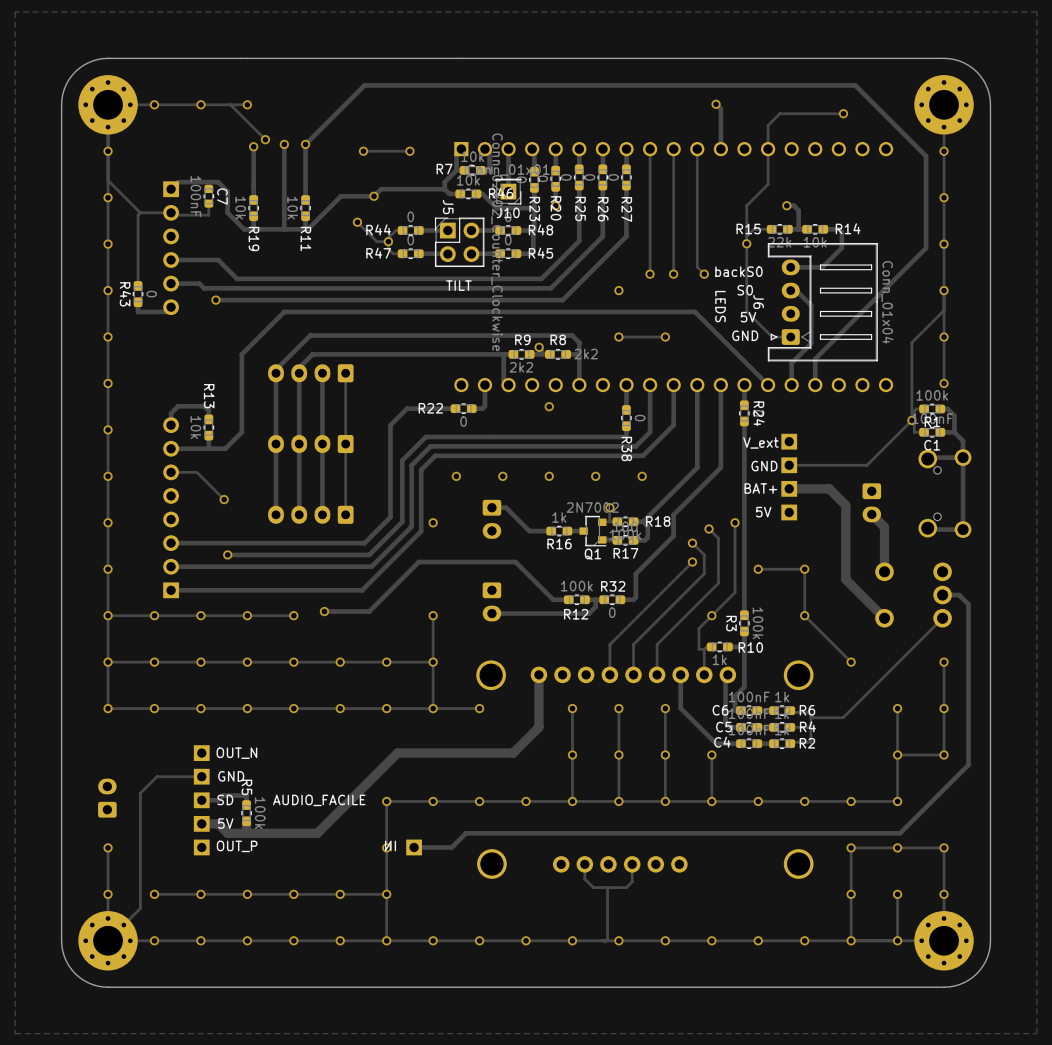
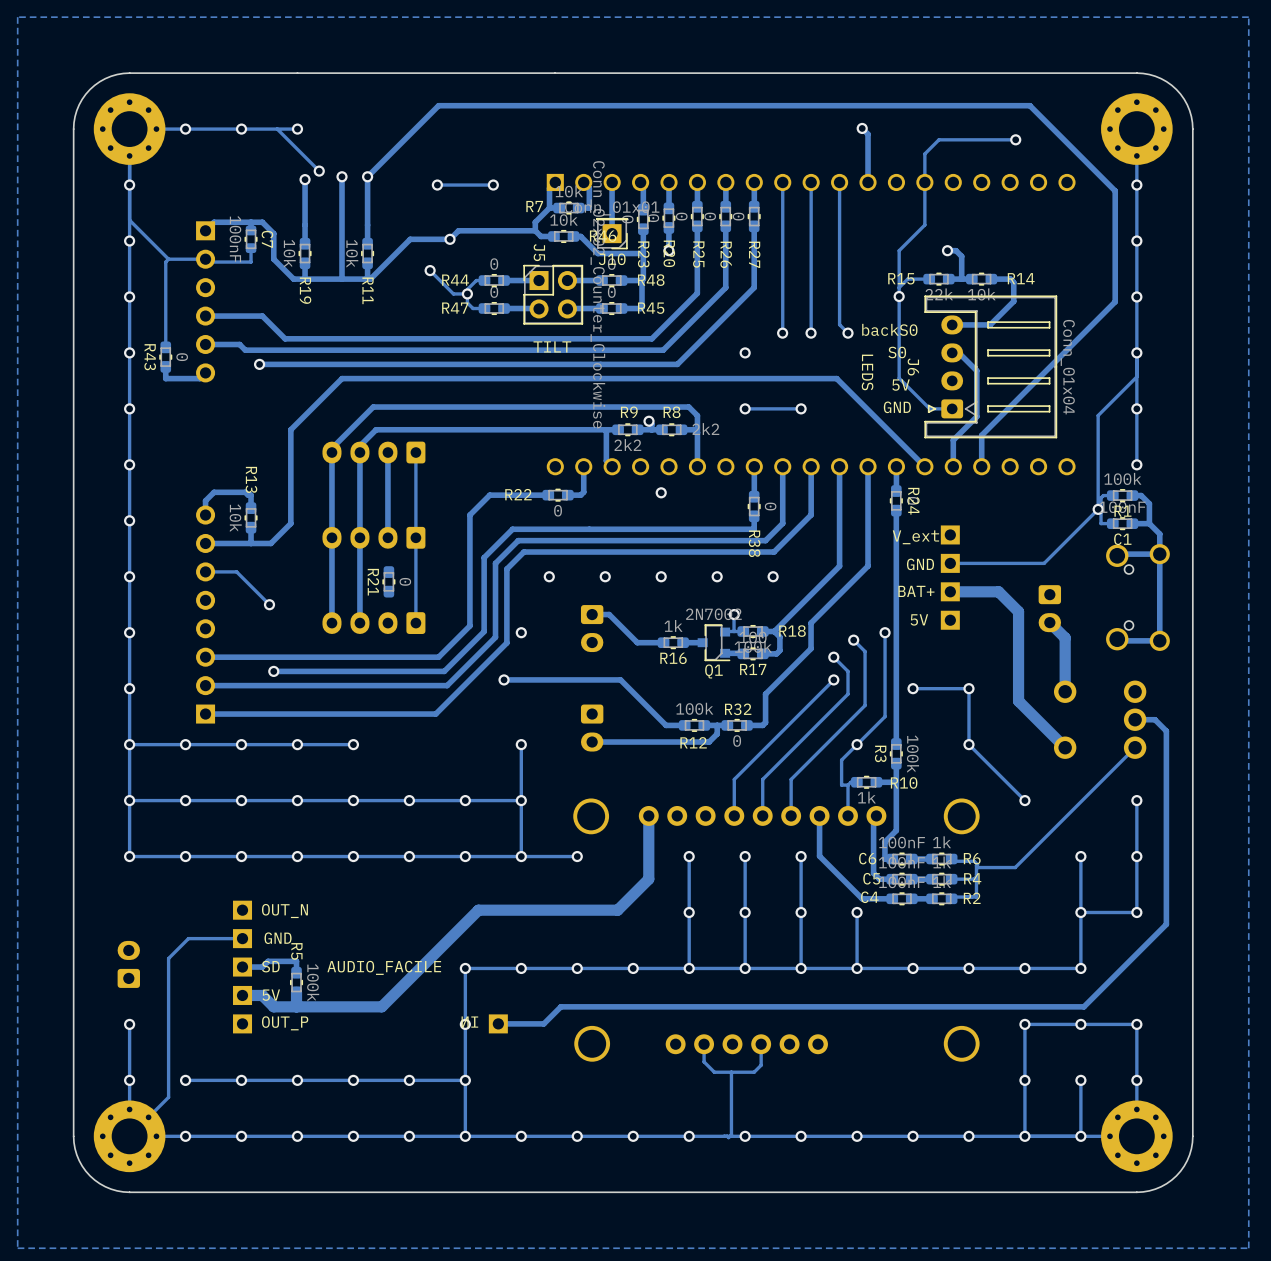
track: (322, 444) (322, 514) -> none
R21: none -> 0 (388, 581)
track: (418, 562) (369, 611) (324, 611) -> none
via: none -> (504, 679)
via: (324, 611) -> none

